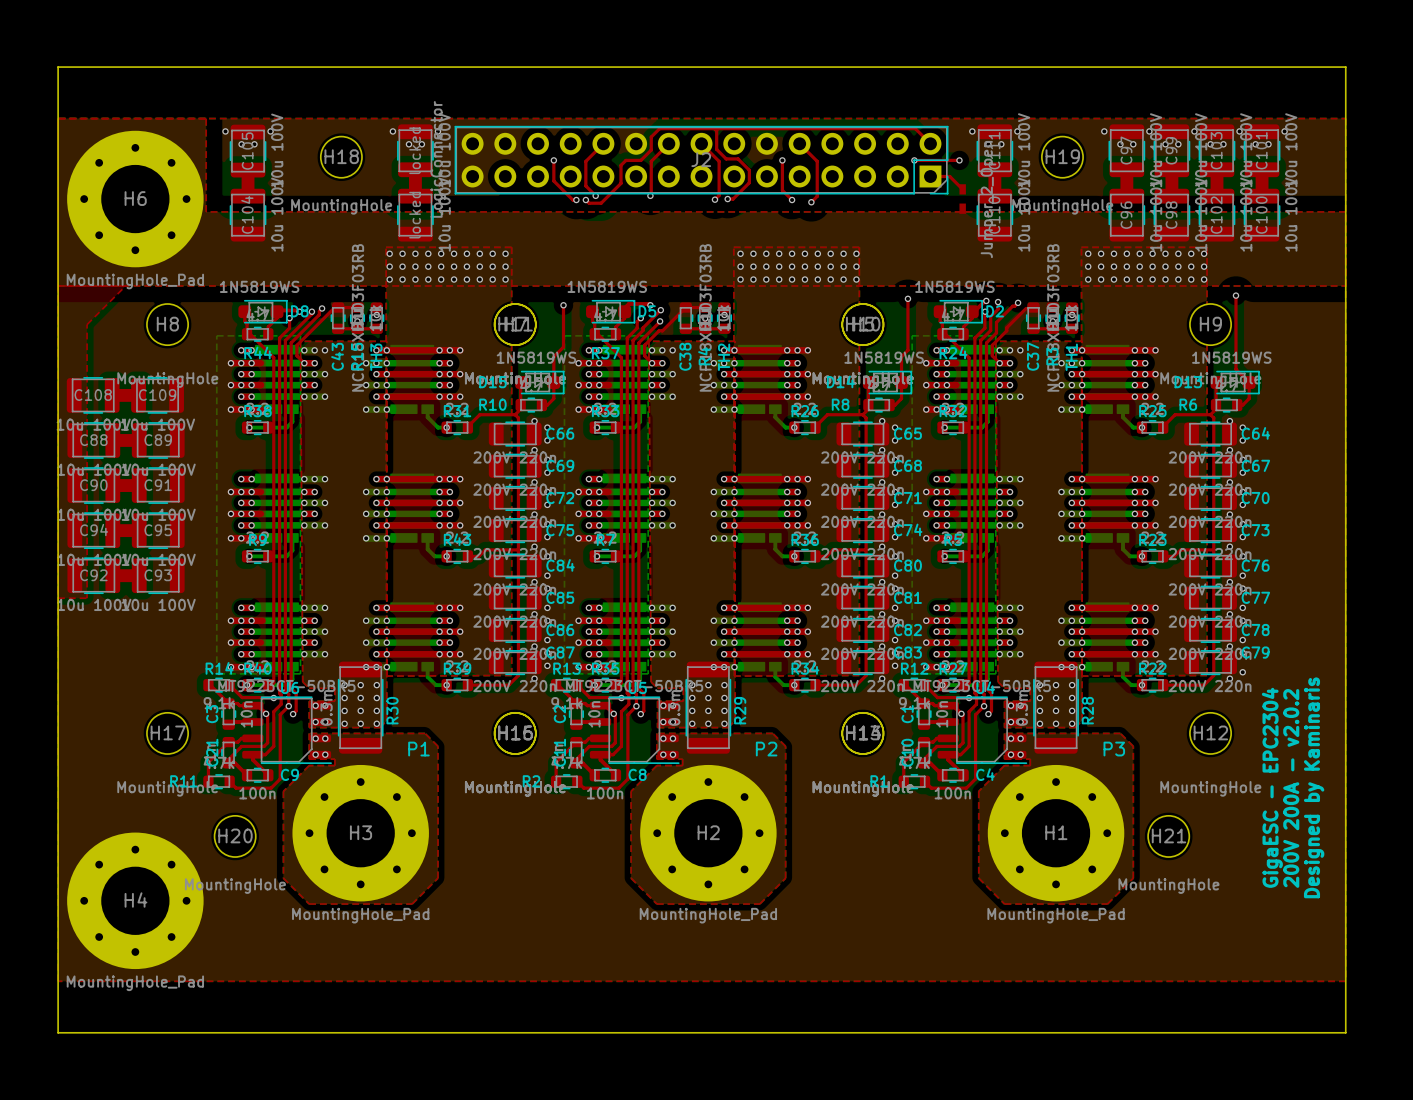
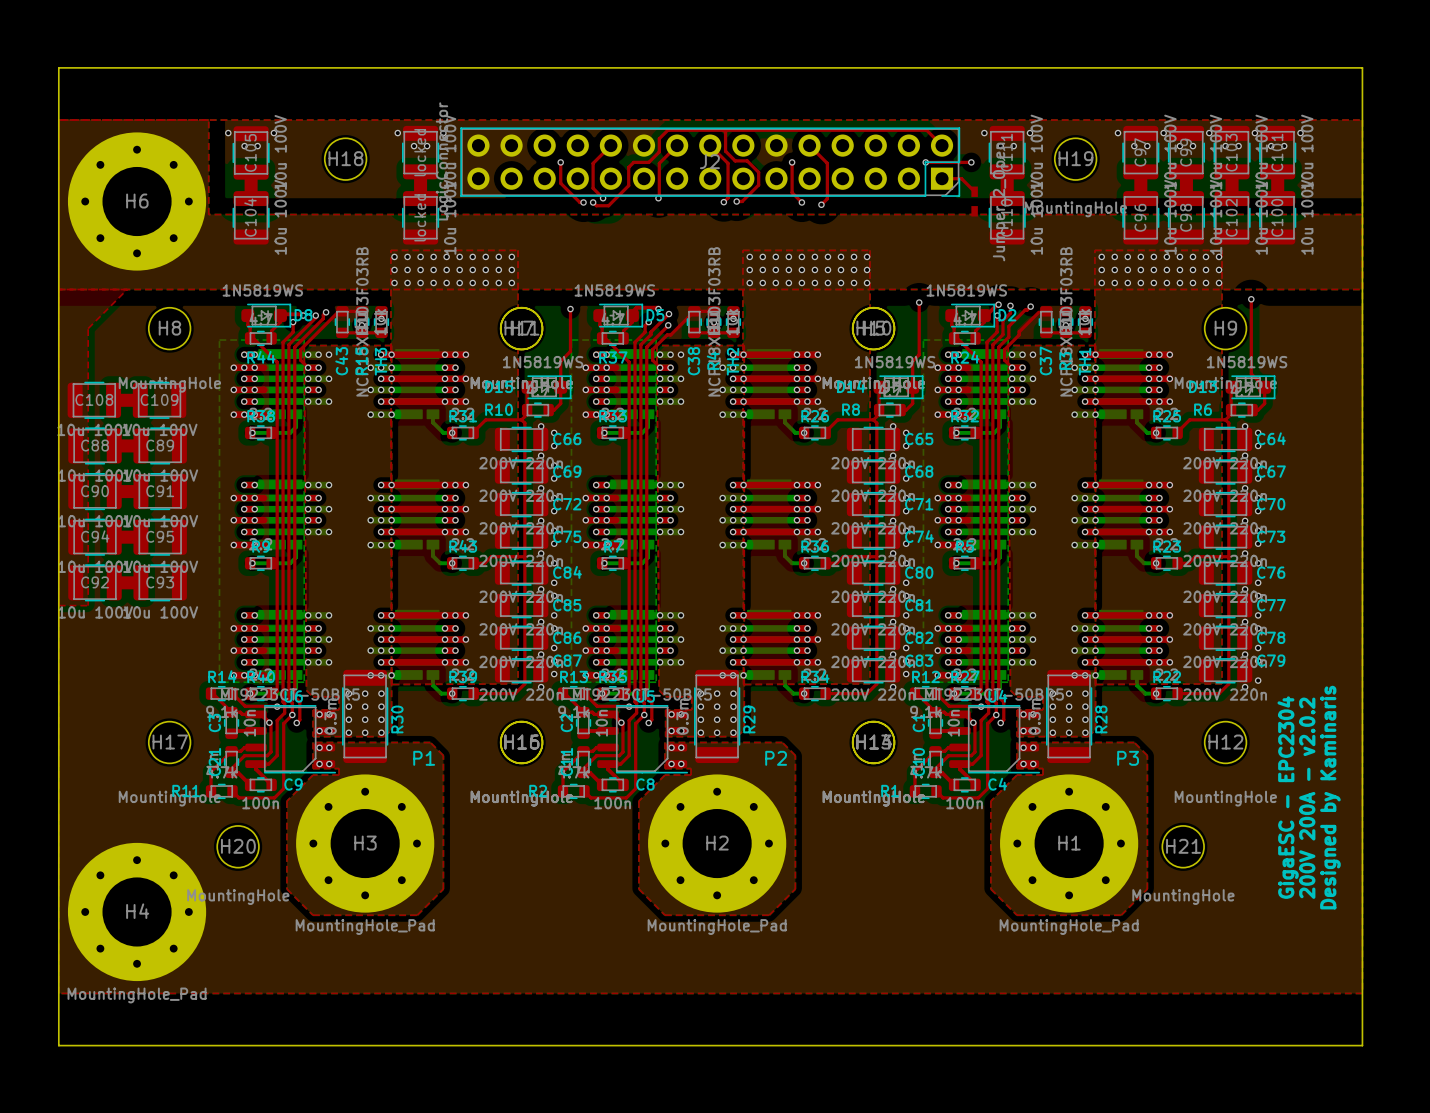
H18 value: MountingHole (341, 206) -> none
H6 value: MountingHole_Pad (135, 281) -> none

